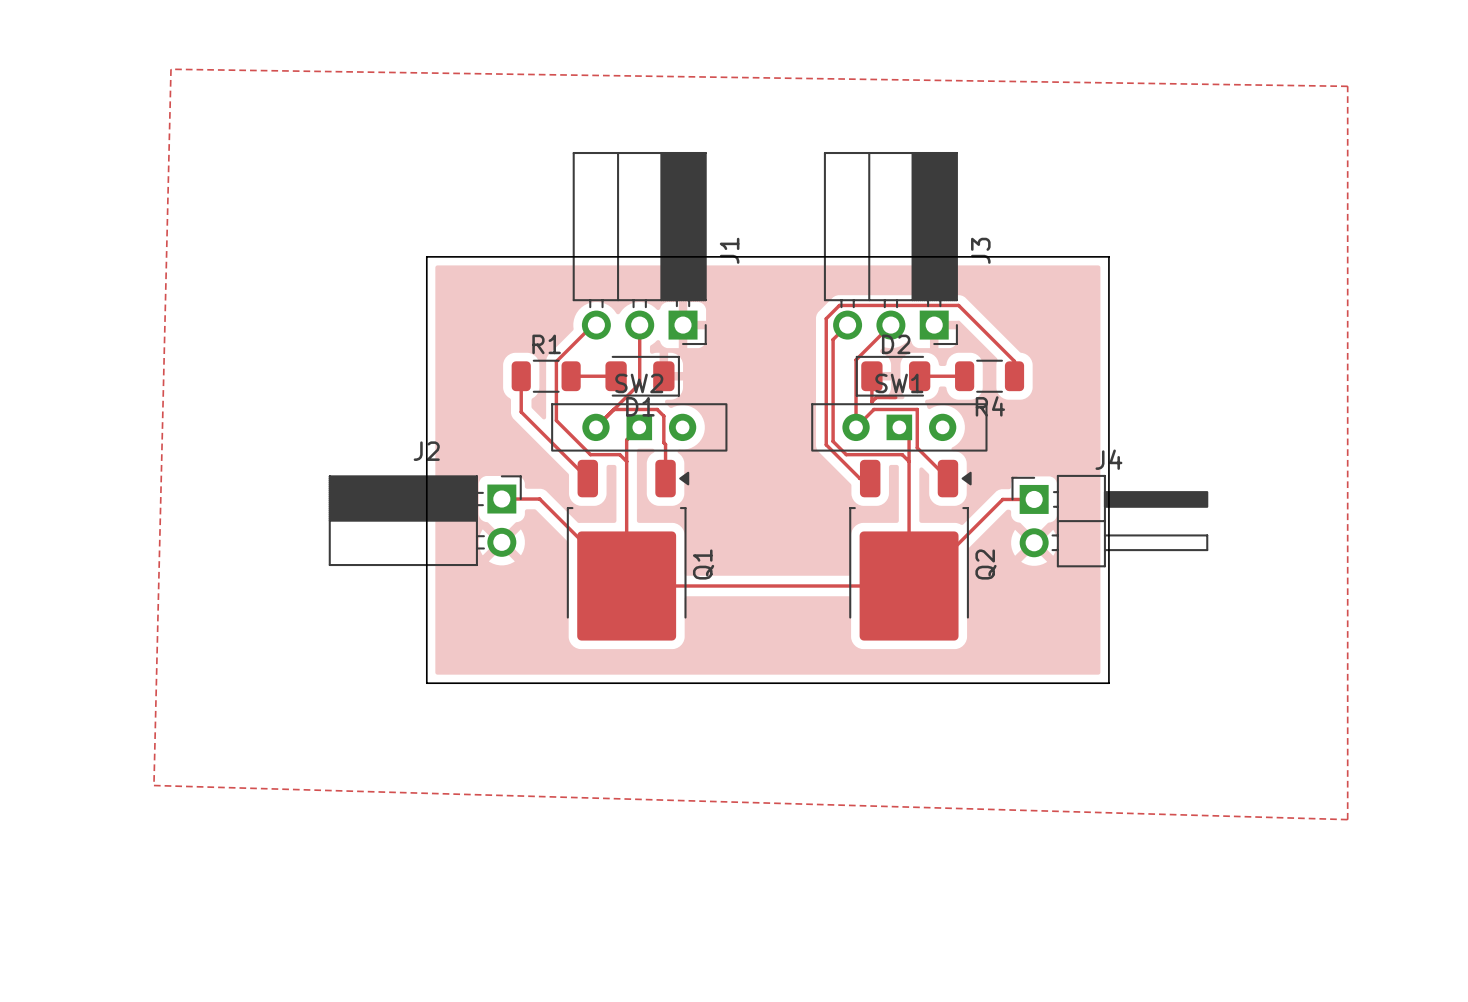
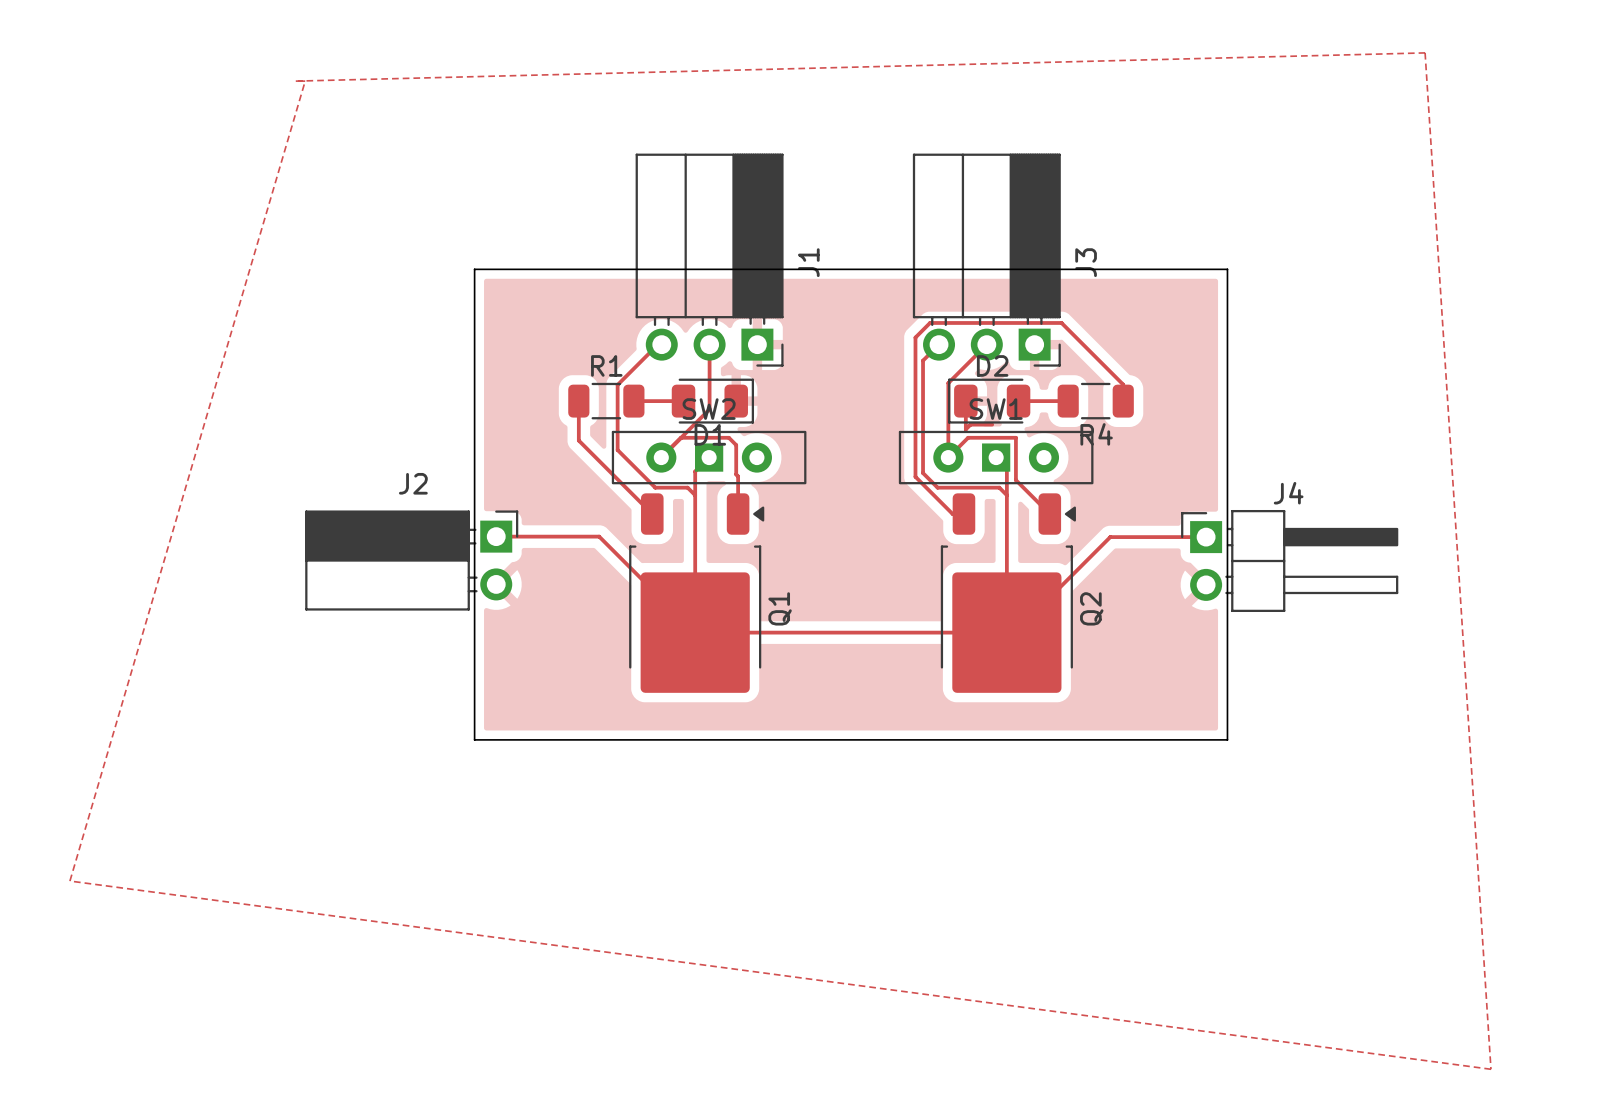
zone outline: (171, 69) (1347, 86) (1347, 819) (153, 785) (171, 69) -> (1425, 52) (295, 81) (305, 81) (69, 881) (1490, 1069) (1425, 52)
track: none -> (496, 536) (557, 536)
track: none -> (1144, 537) (1206, 537)
J2 position: (425, 520) -> (411, 560)
J4 position: (1109, 521) -> (1289, 560)

